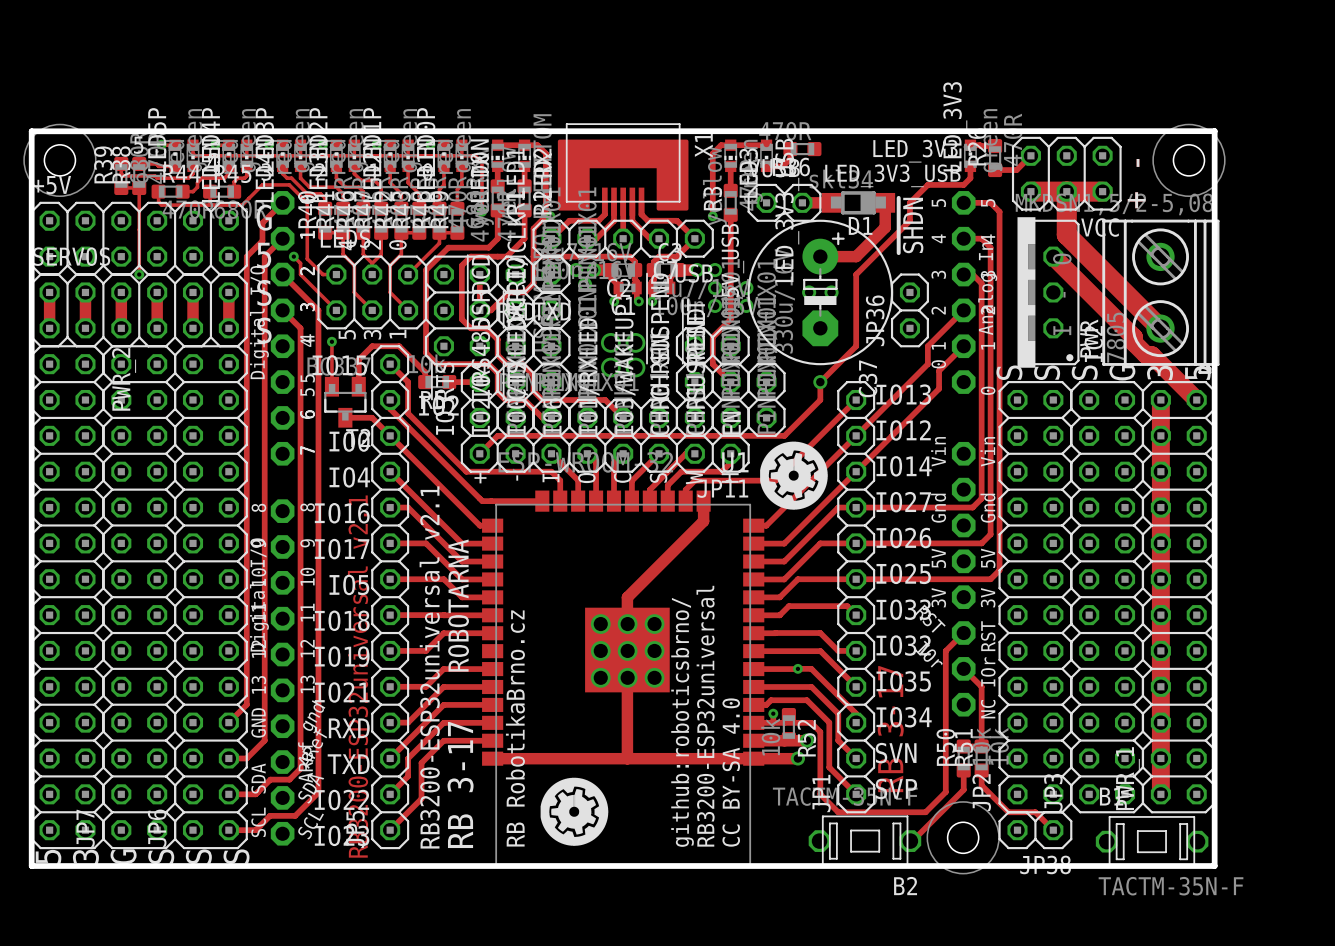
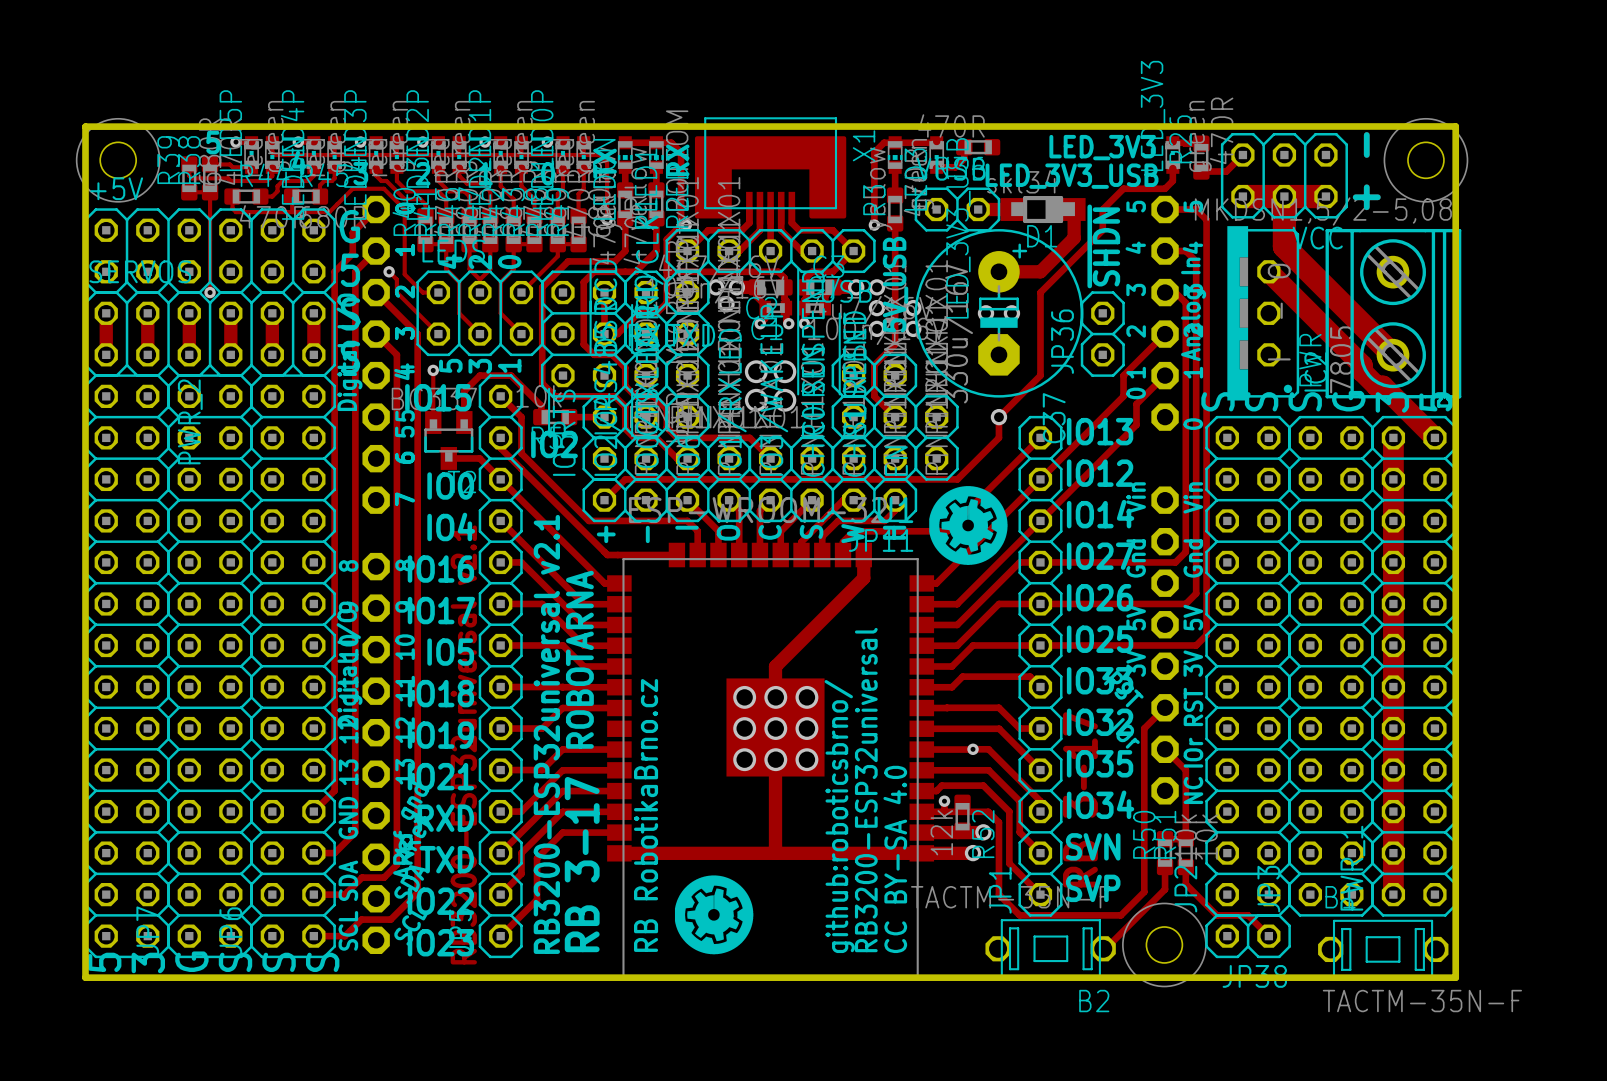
R52 value: 10k (770, 736) -> 12k (941, 832)

